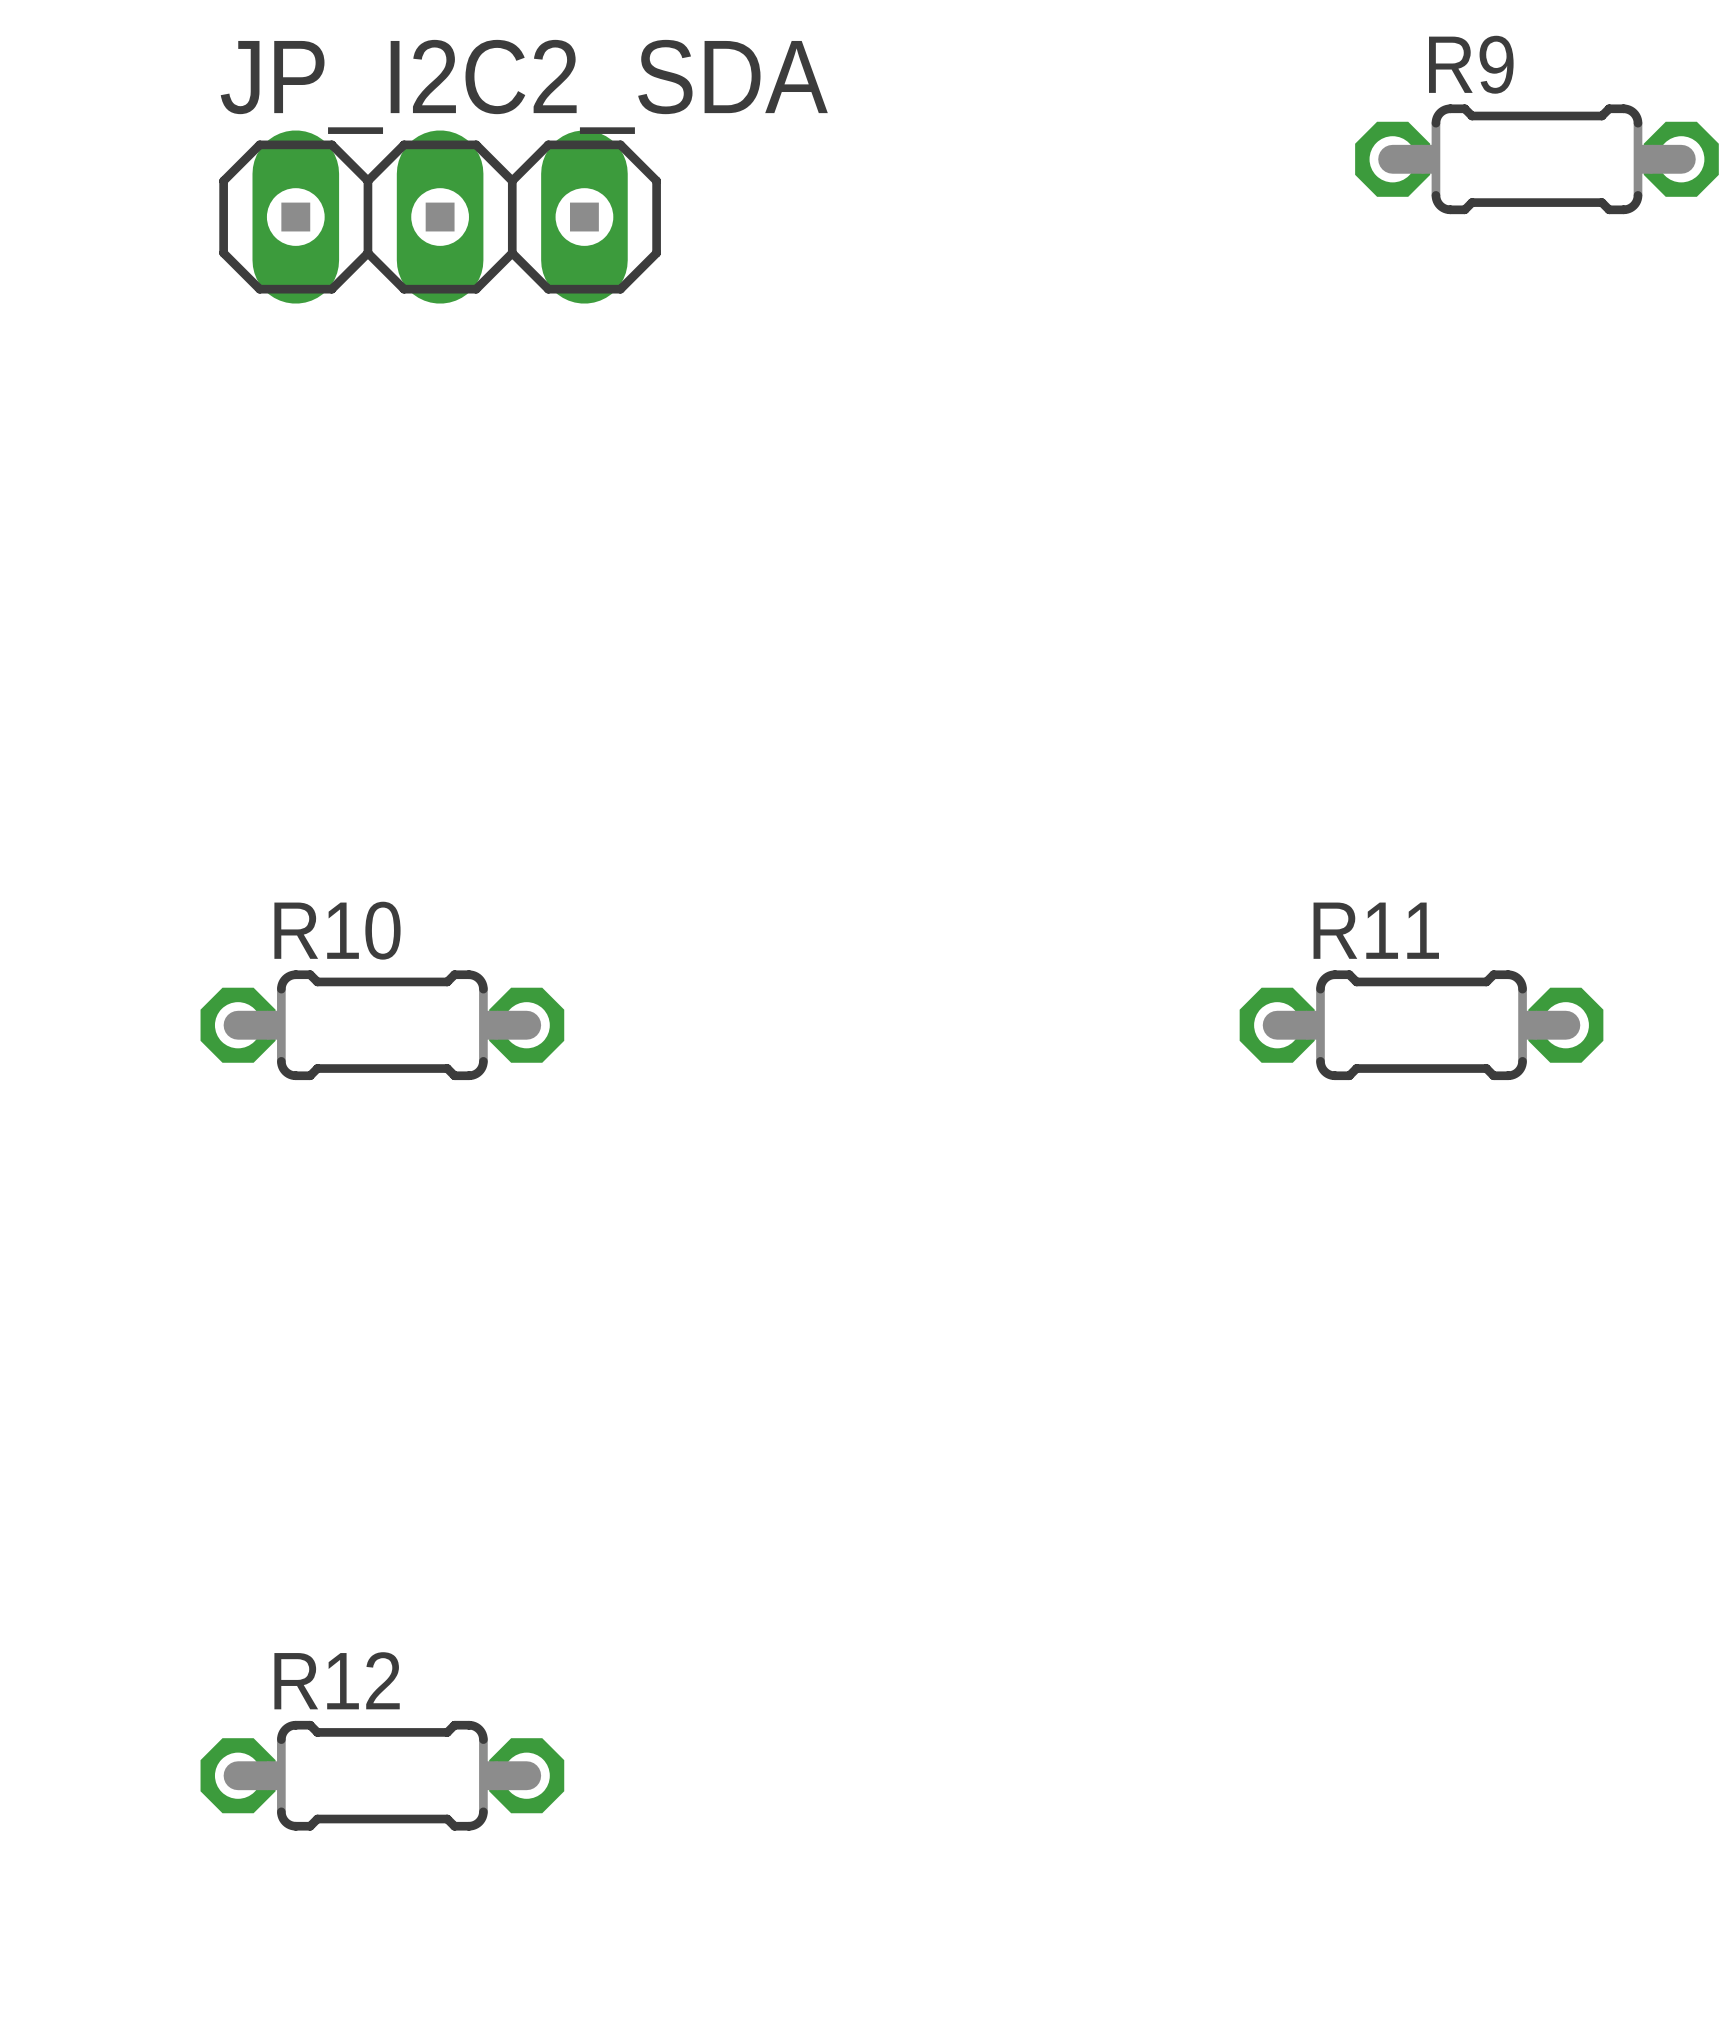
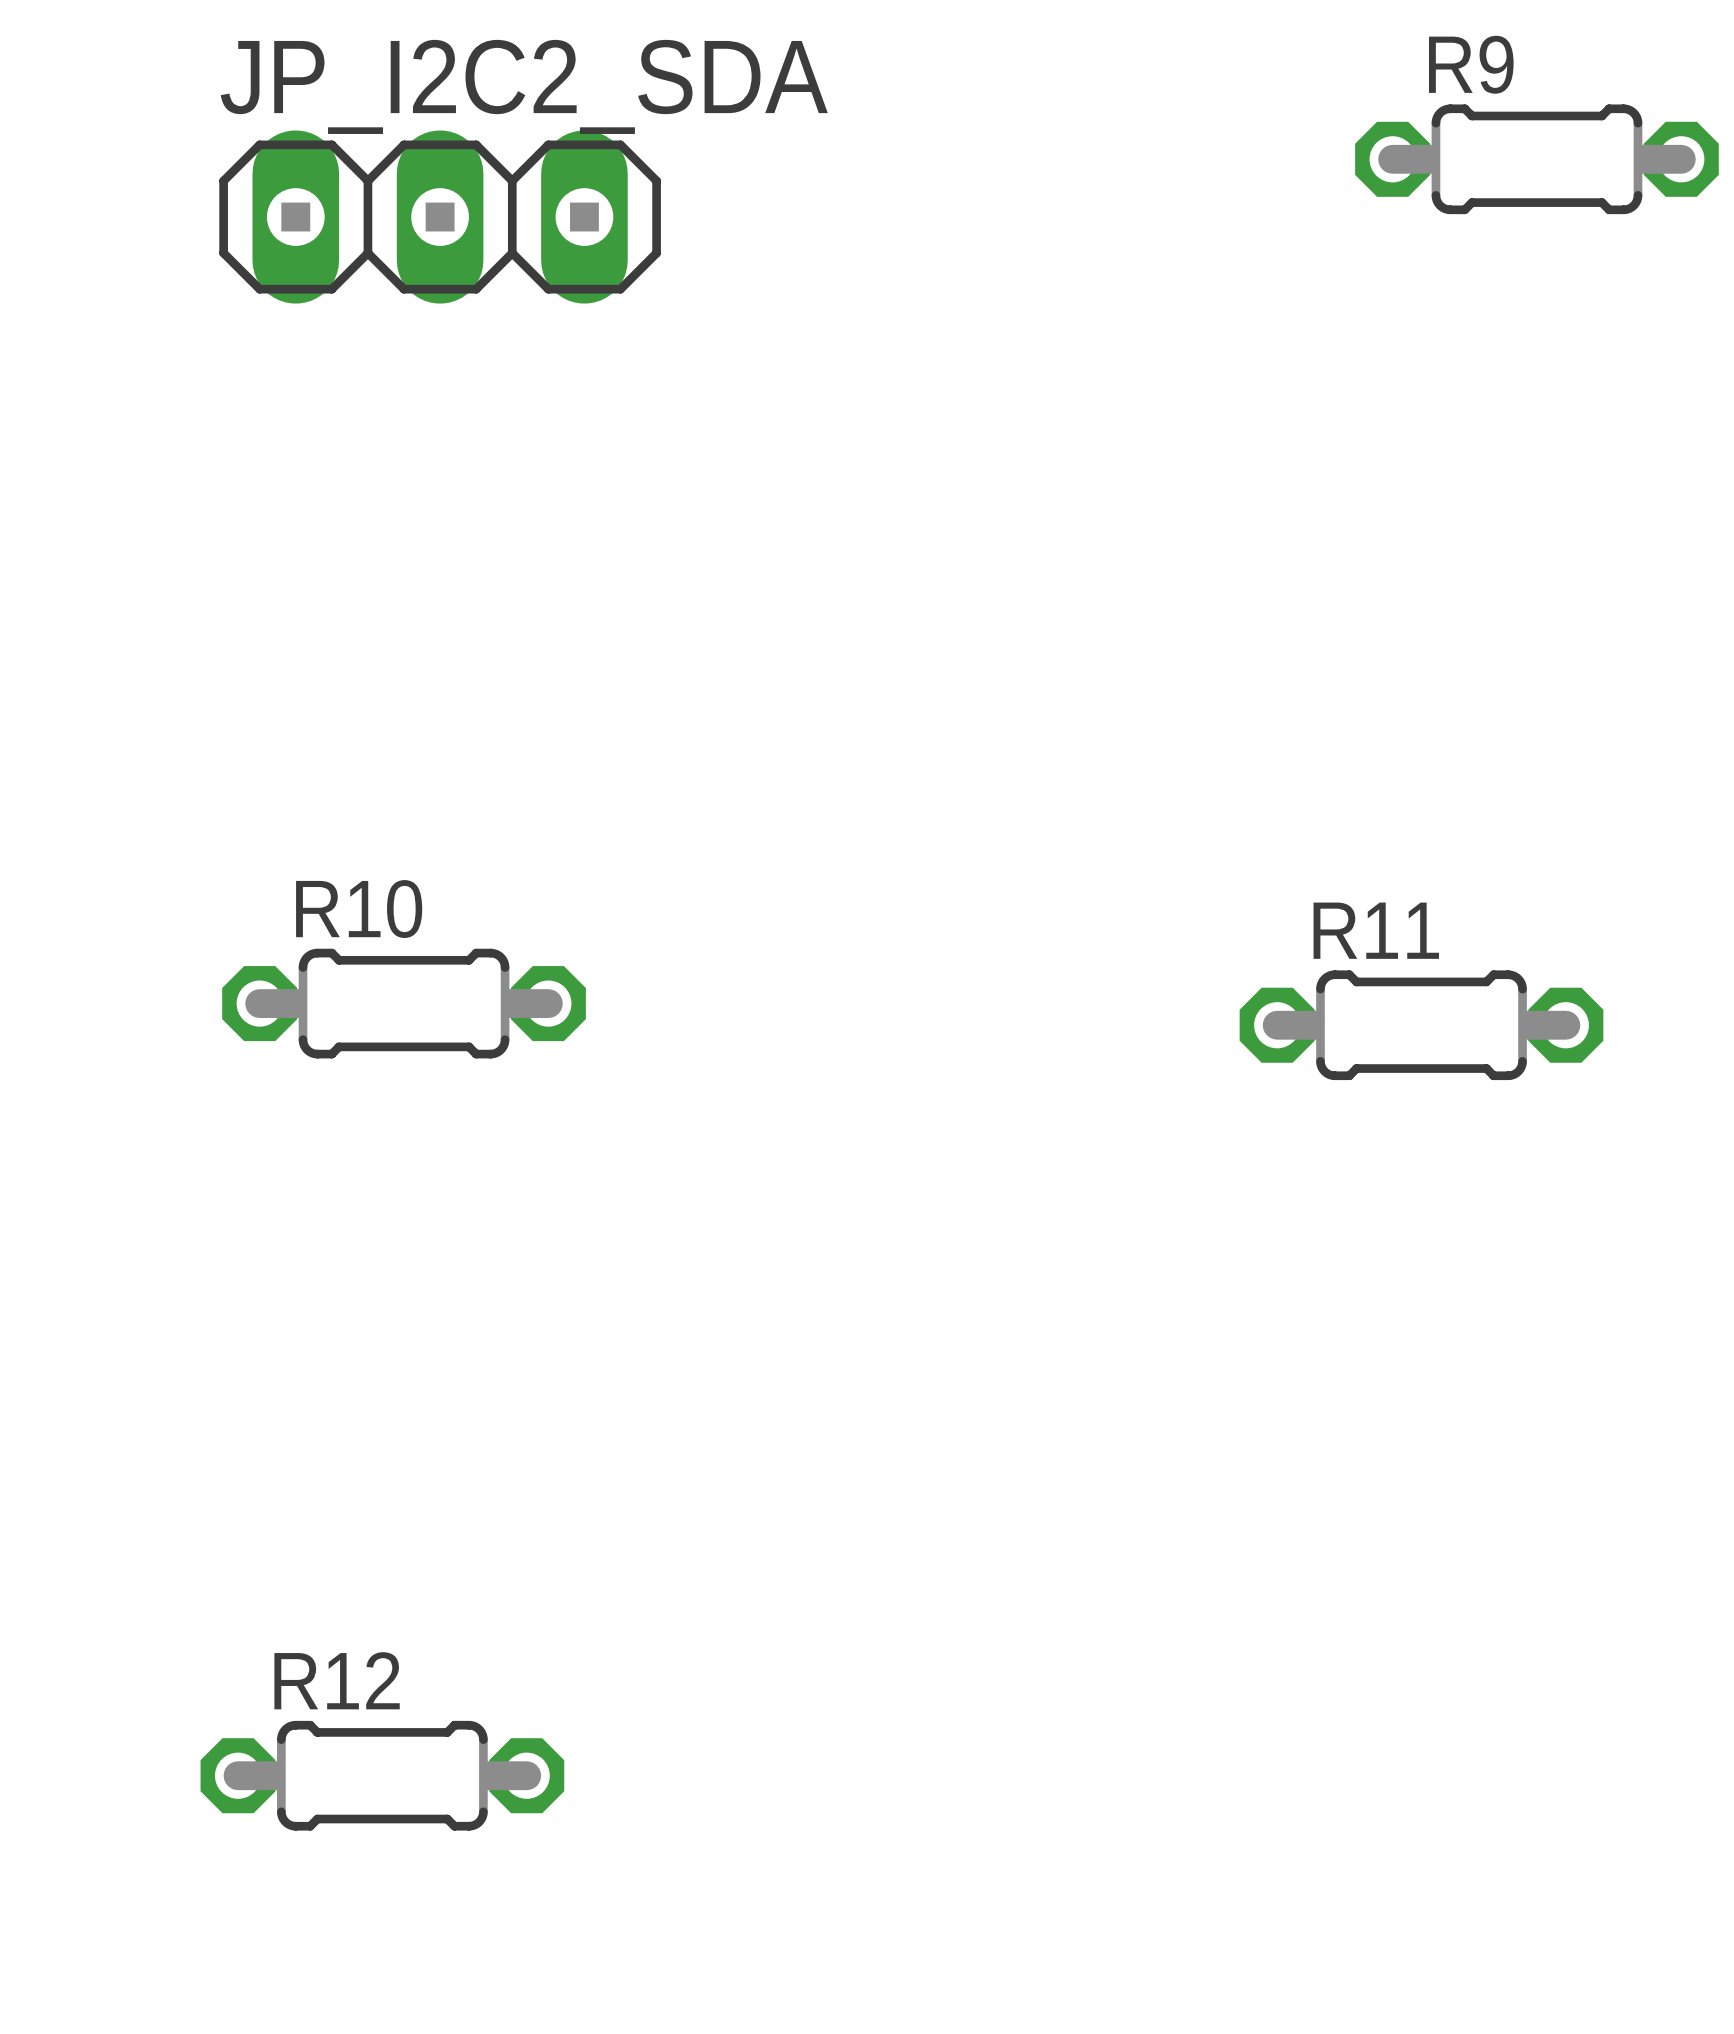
R10 position: (382, 1025) -> (404, 1003)

